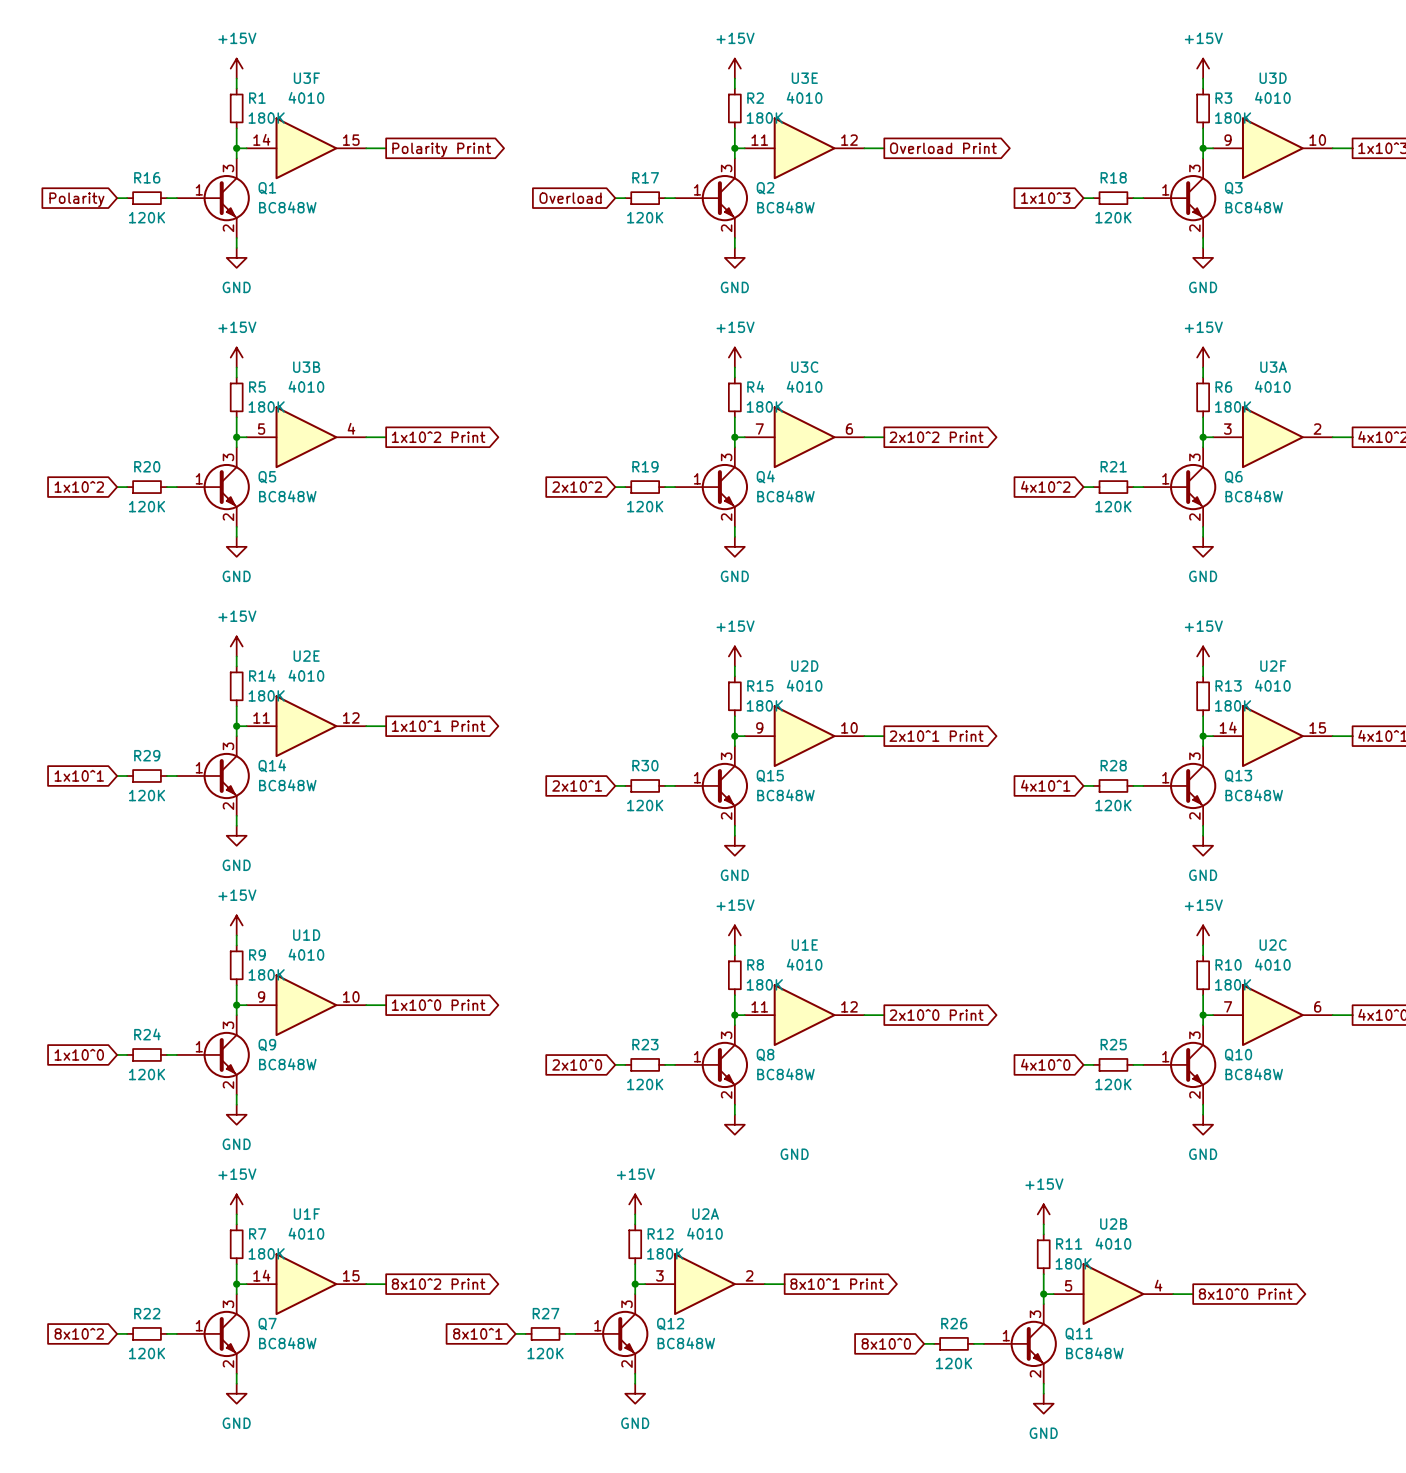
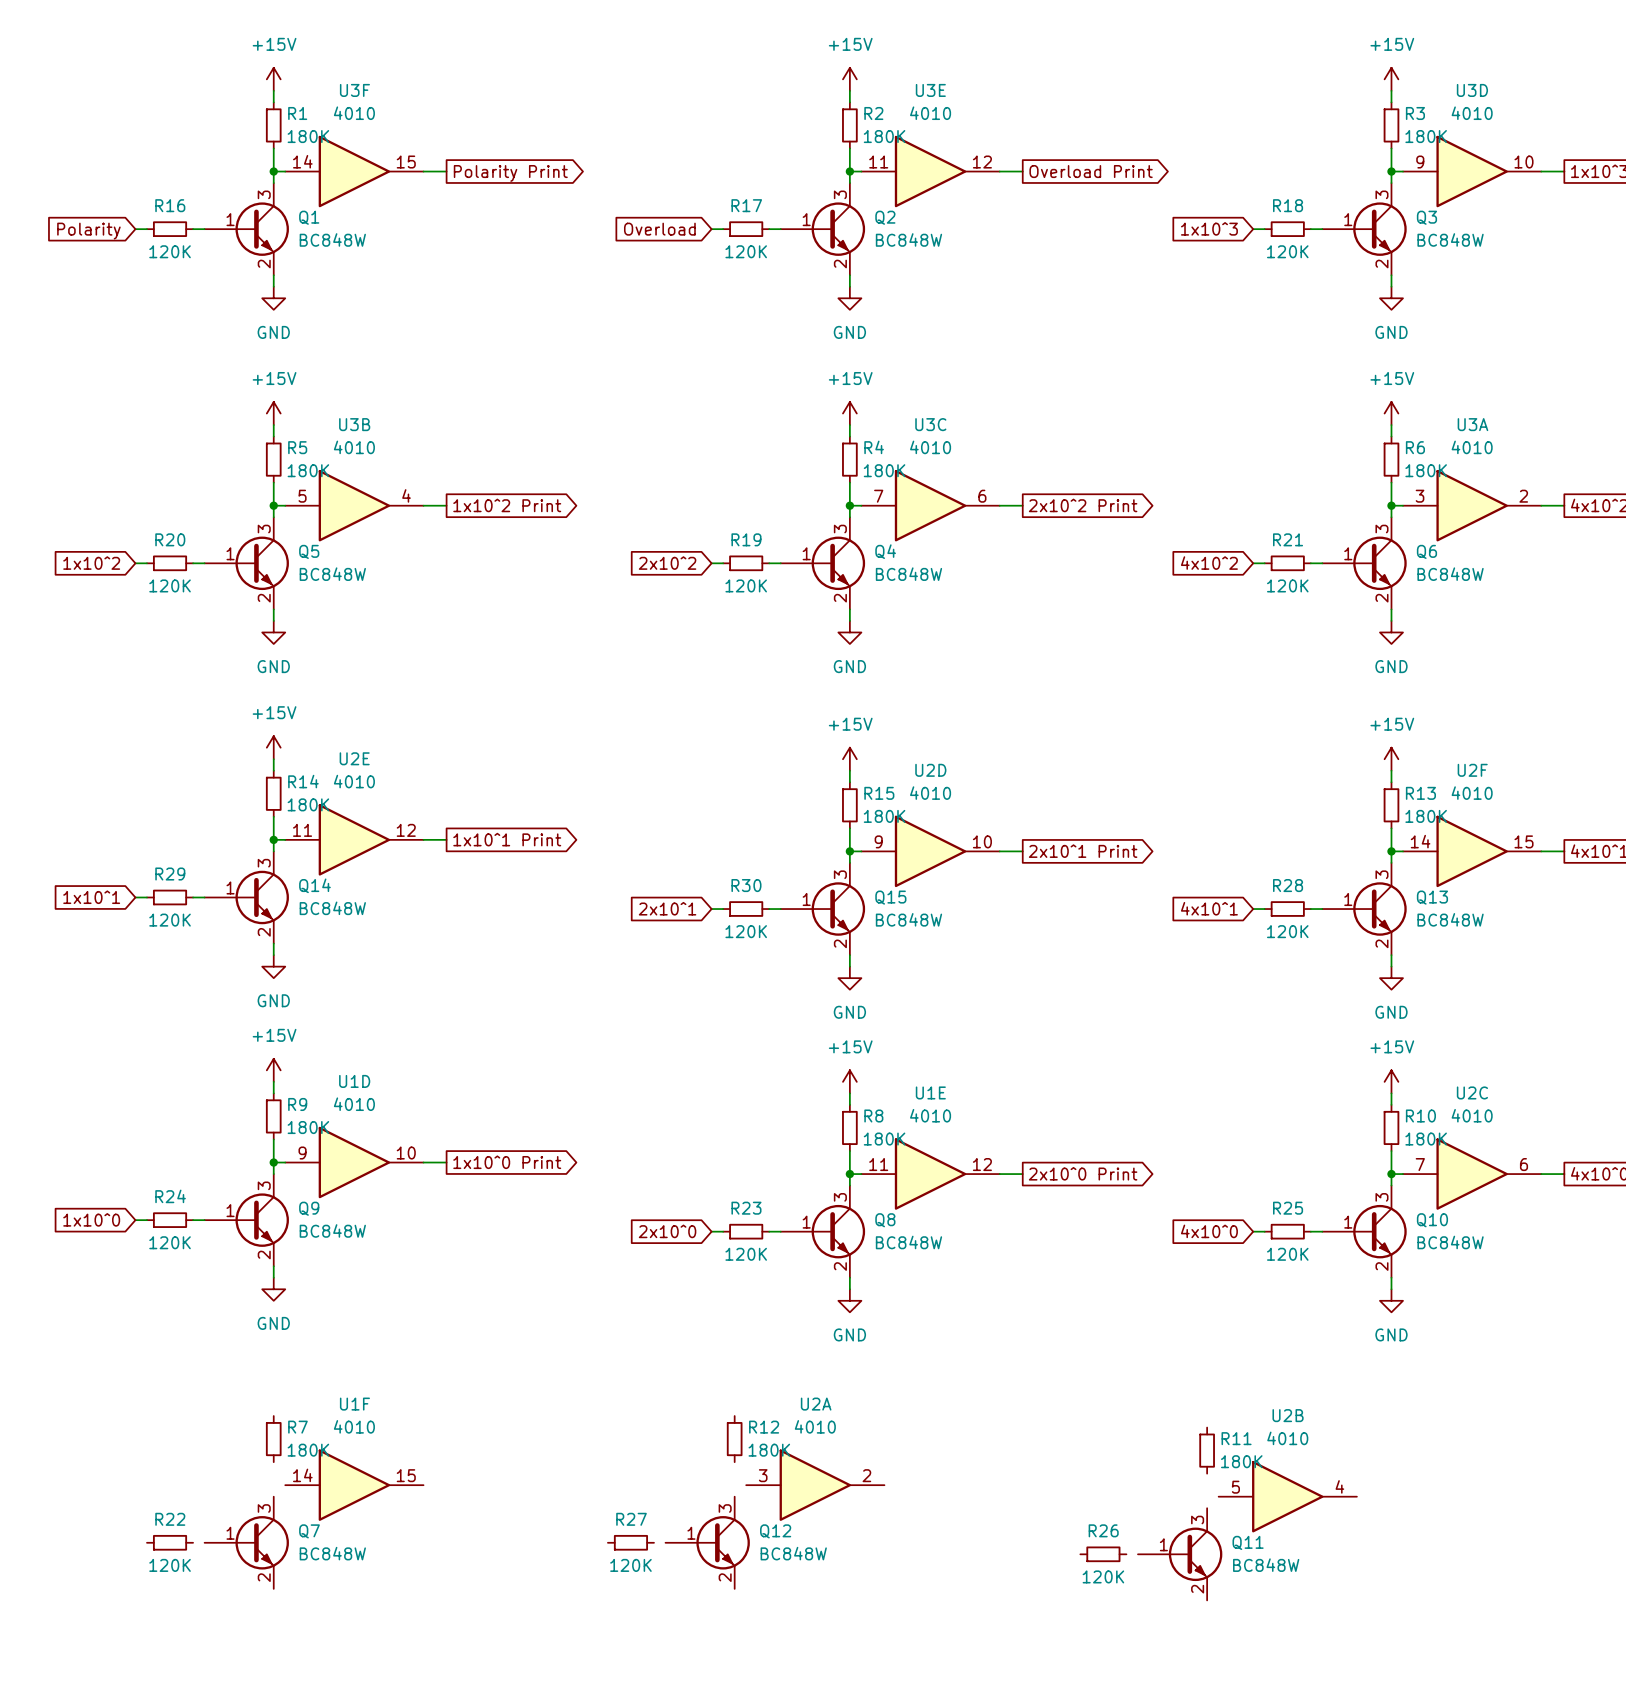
power symbol text position: GND (794, 1154) -> GND (849, 1334)
power symbol: +15V (236, 1204) -> none
power symbol: +15V (635, 1204) -> none
wire: (236, 1214) (236, 1224) -> none
wire: (635, 1214) (635, 1224) -> none
power symbol: +15V (1043, 1214) -> none
wire: (1043, 1224) (1043, 1234) -> none
wire: (236, 1264) (236, 1294) -> none
wire: (635, 1264) (635, 1294) -> none
wire: (1043, 1274) (1043, 1304) -> none
global label: 8x10^2 Print (438, 1283) -> none
global label: 8x10^1 Print (837, 1283) -> none
wire: (236, 1284) (246, 1284) -> none
junction: (236, 1284) -> none
wire: (366, 1284) (386, 1284) -> none
wire: (635, 1284) (645, 1284) -> none
junction: (635, 1284) -> none
wire: (764, 1284) (784, 1284) -> none
global label: 8x10^0 Print (1245, 1293) -> none
wire: (1043, 1294) (1053, 1294) -> none
junction: (1043, 1294) -> none
wire: (1173, 1294) (1193, 1294) -> none
global label: 8x10^2 (79, 1333) -> none
wire: (117, 1333) (127, 1333) -> none
wire: (166, 1333) (176, 1333) -> none
global label: 8x10^1 (477, 1333) -> none
wire: (515, 1333) (525, 1333) -> none
wire: (565, 1333) (575, 1333) -> none
global label: 8x10^0 (886, 1343) -> none
wire: (924, 1343) (934, 1343) -> none
wire: (973, 1343) (983, 1343) -> none
wire: (236, 1373) (236, 1383) -> none
wire: (635, 1373) (635, 1383) -> none
wire: (1043, 1383) (1043, 1393) -> none
power symbol: GND (236, 1393) -> none
power symbol: GND (635, 1393) -> none
power symbol: GND (1043, 1403) -> none

